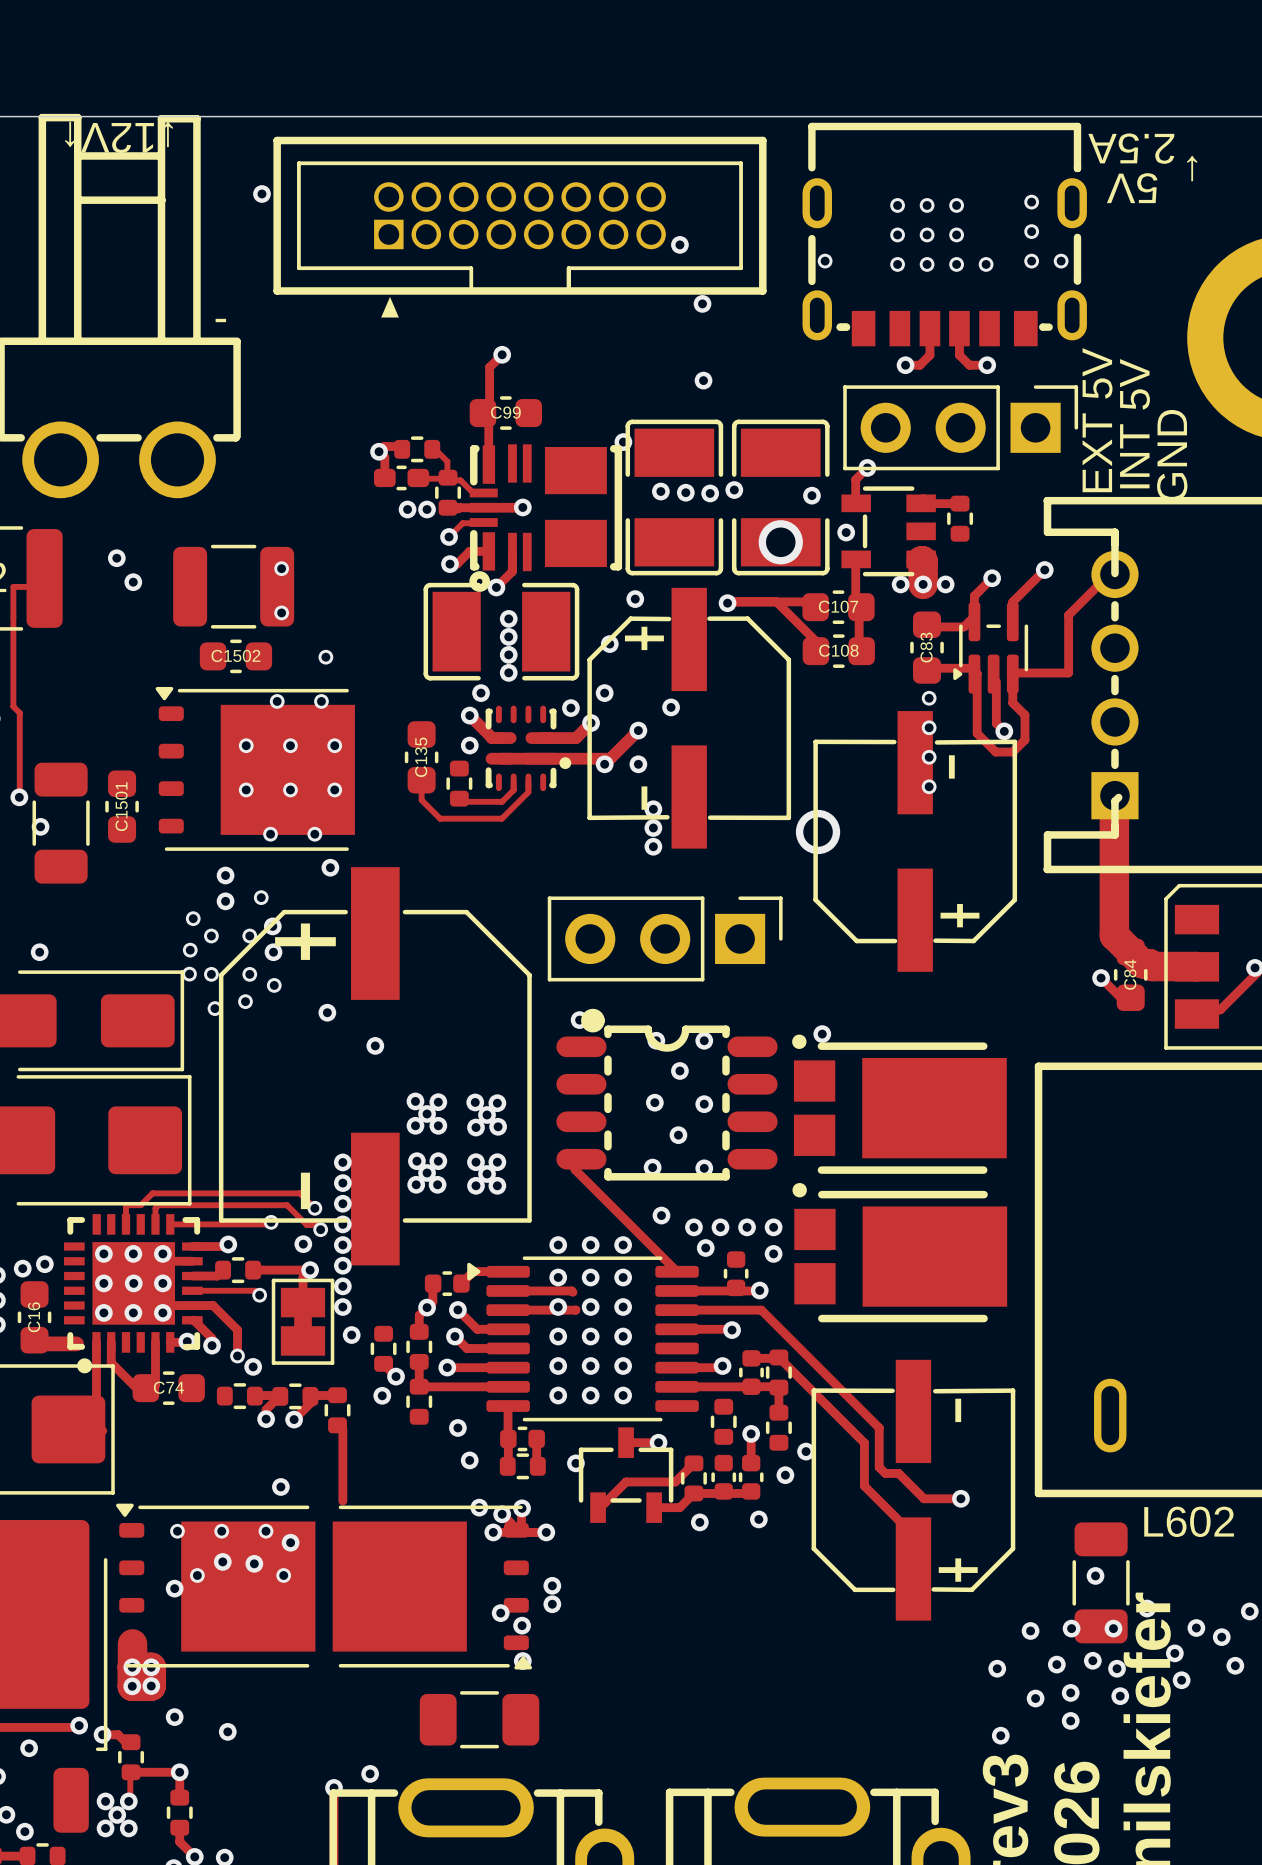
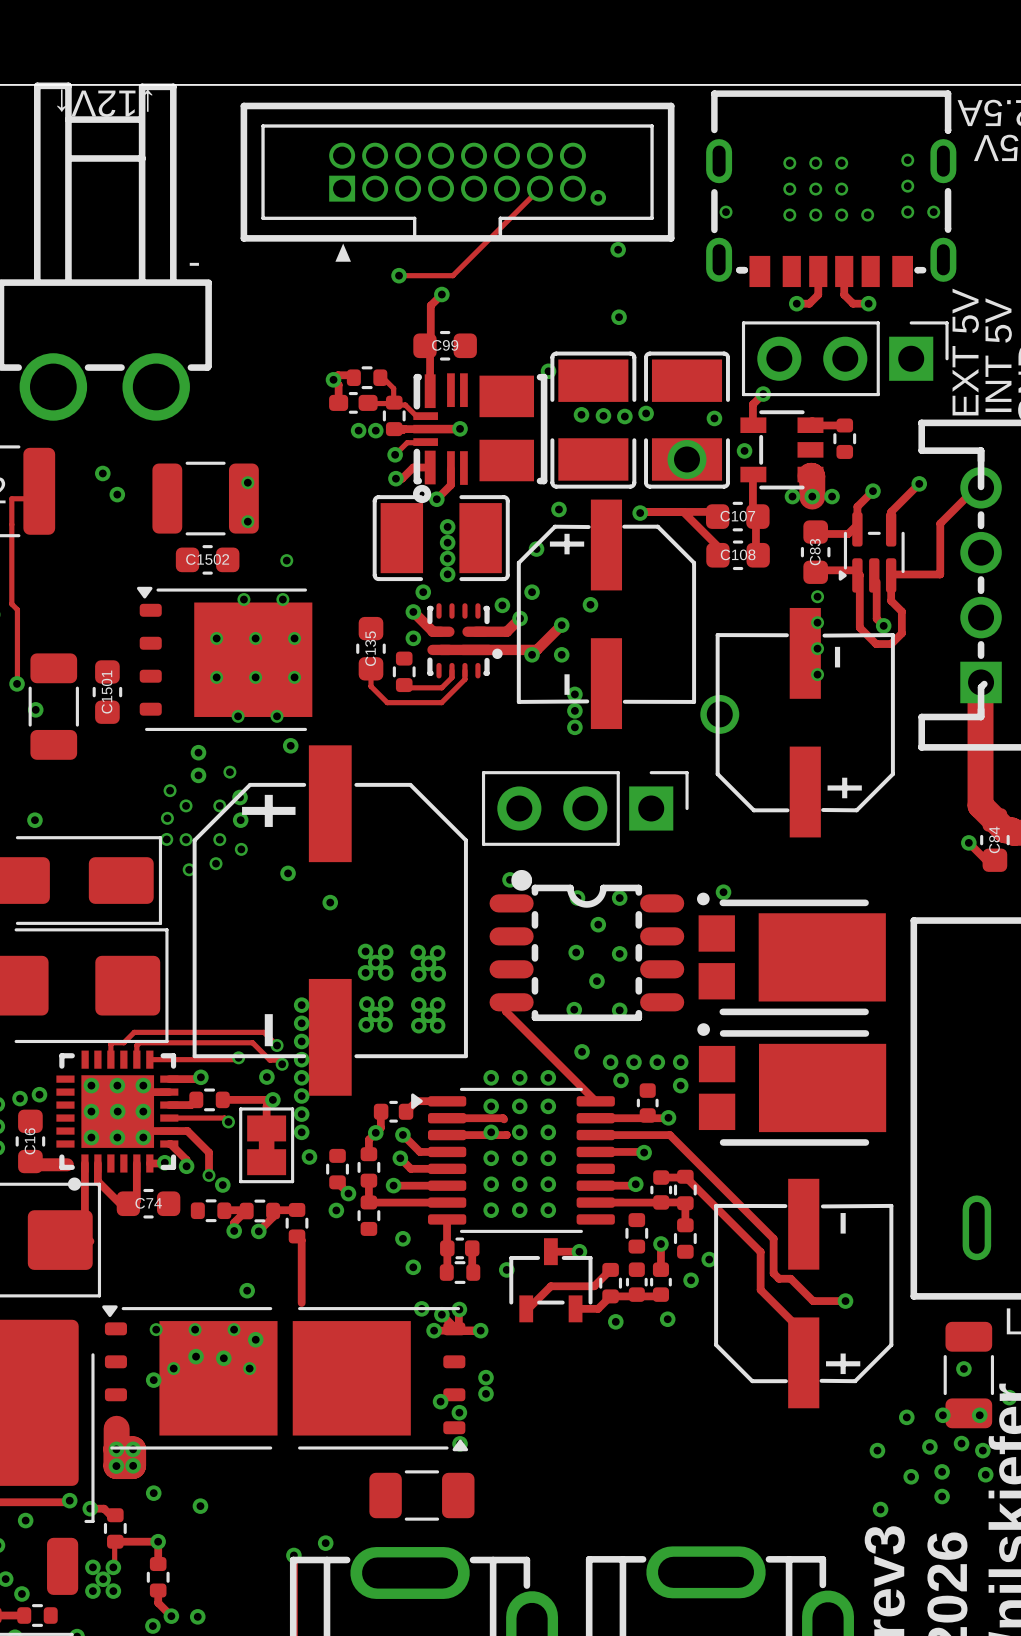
via: (261, 193) -> none
track: none -> (539, 188) (452, 275) (399, 275)
via: none -> (399, 275)

